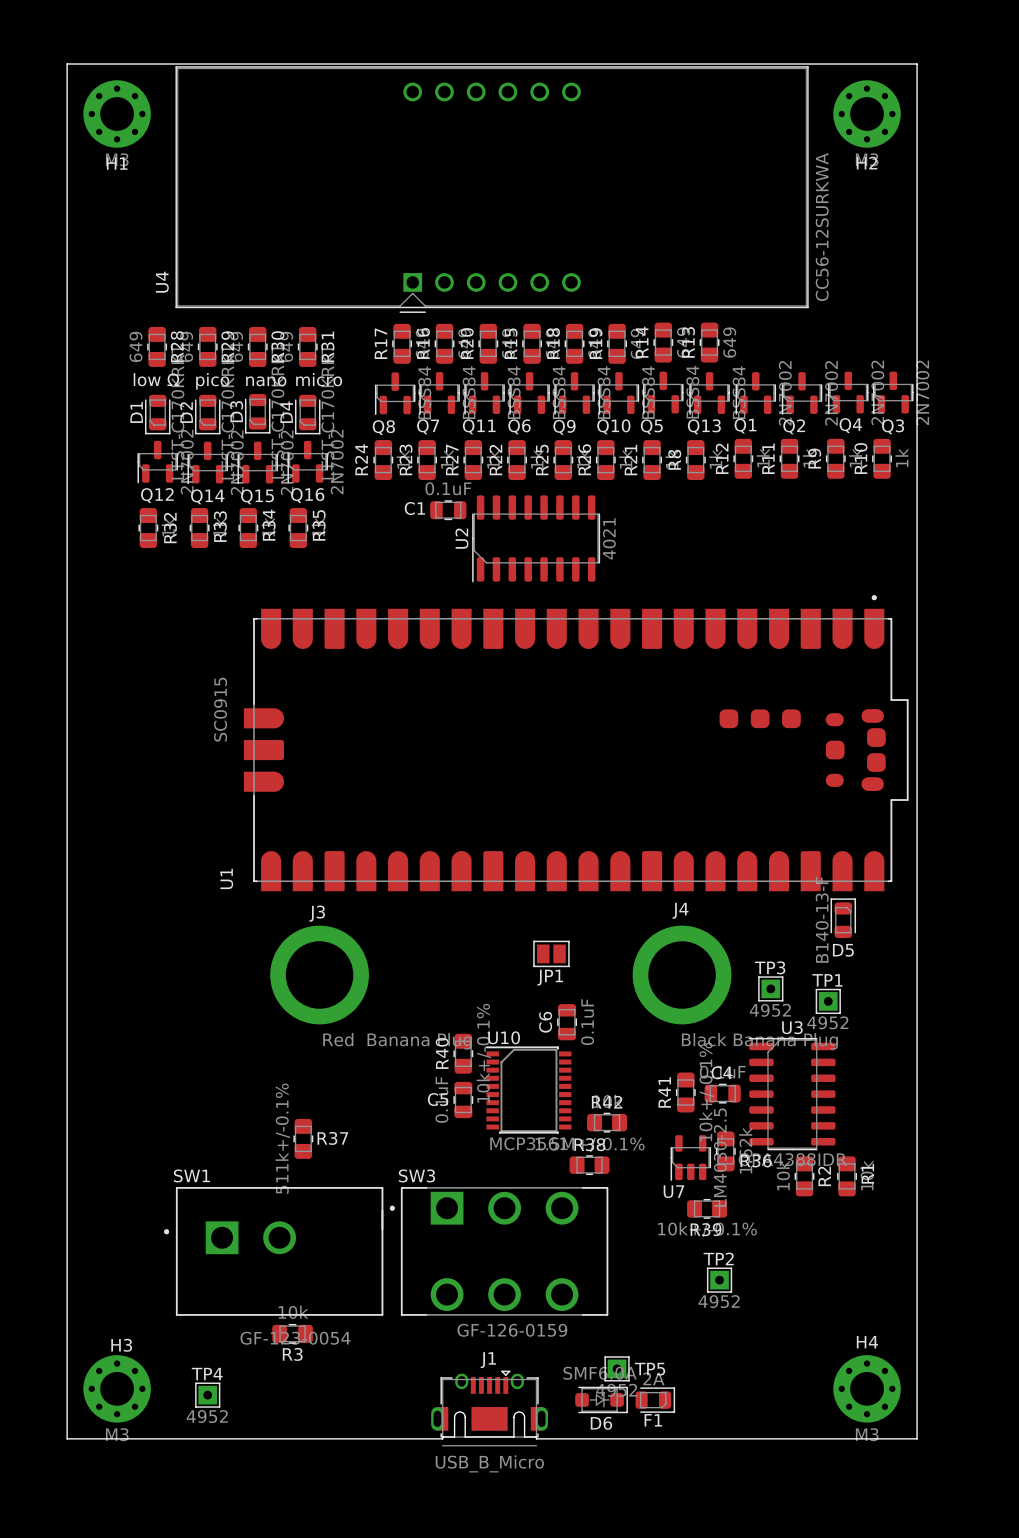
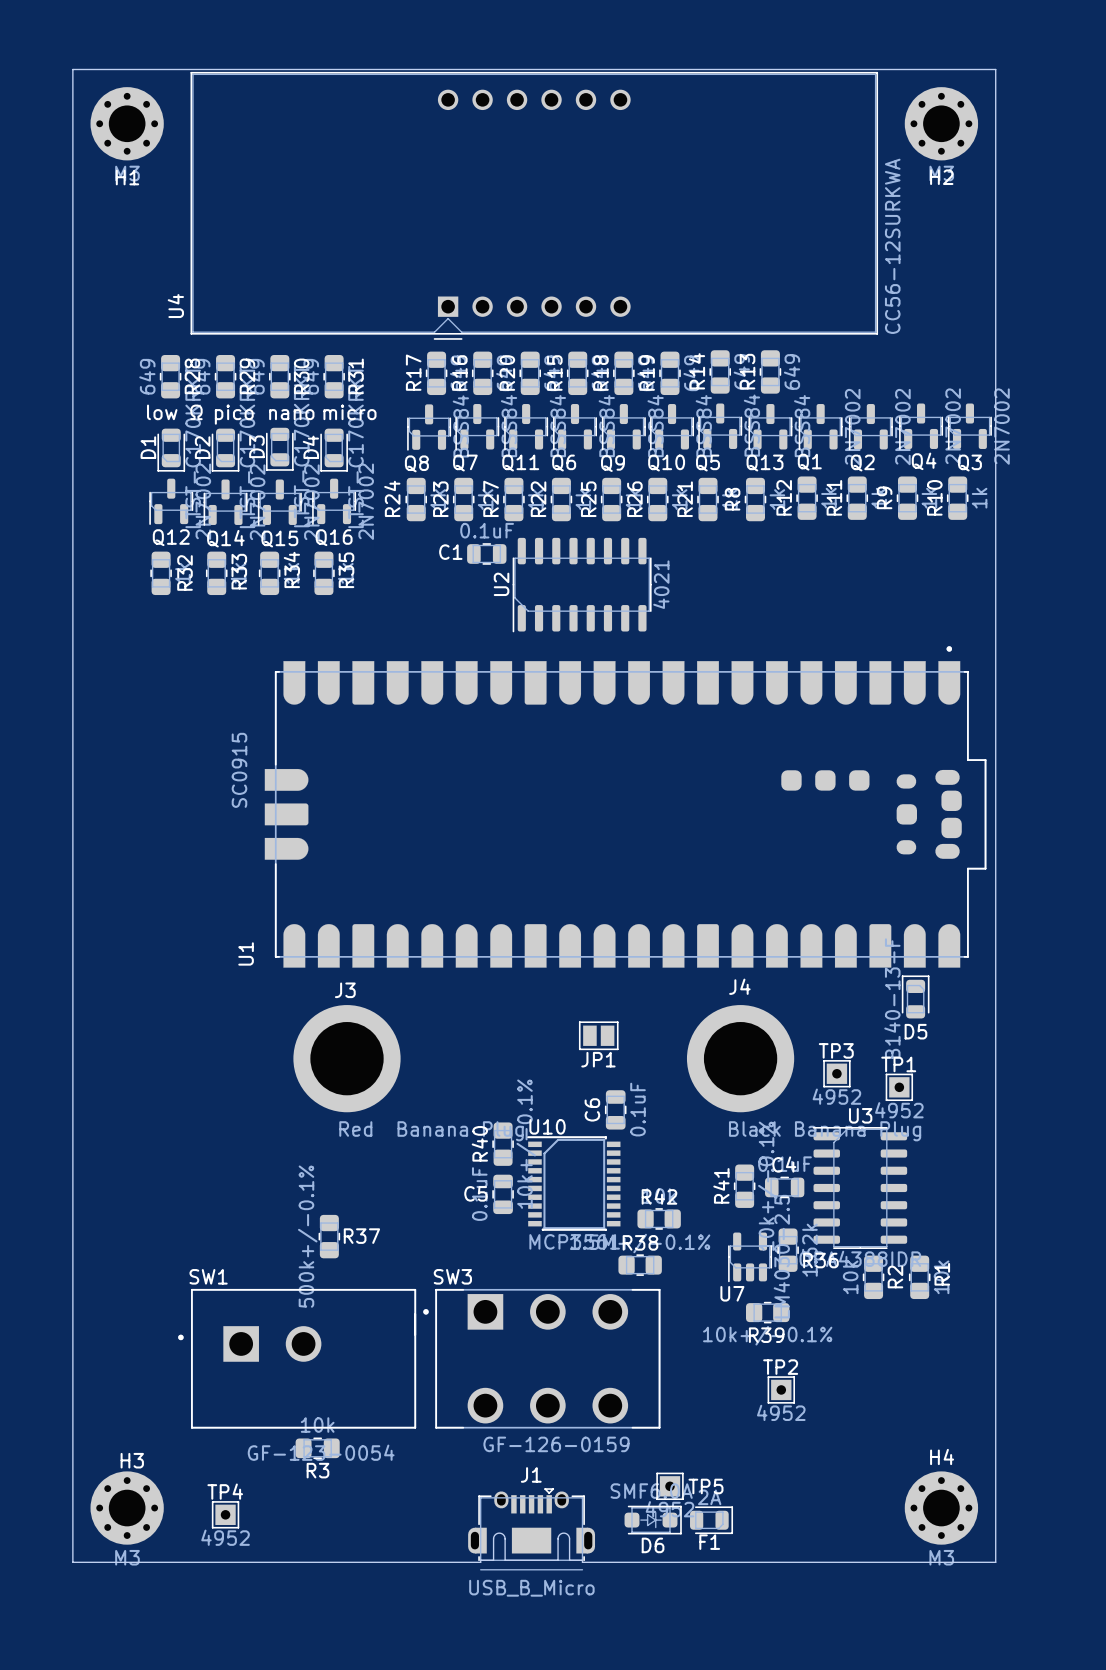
R37 value: 511k+/-0.1% (282, 1138) -> 500k+/-0.1% (307, 1236)

